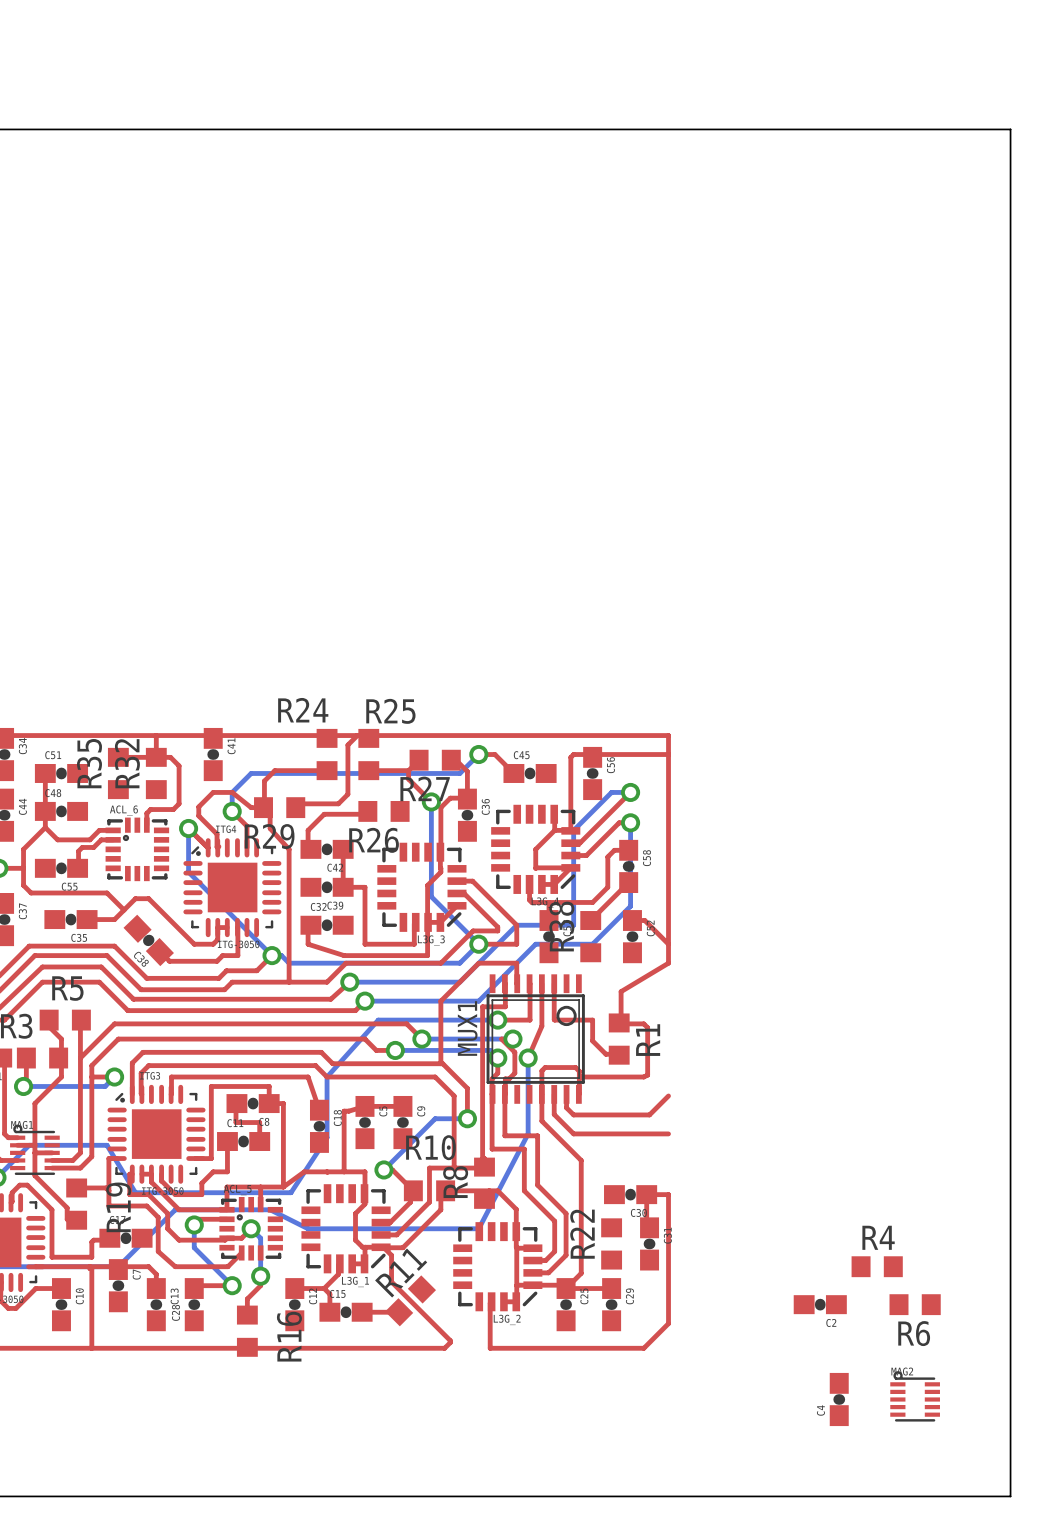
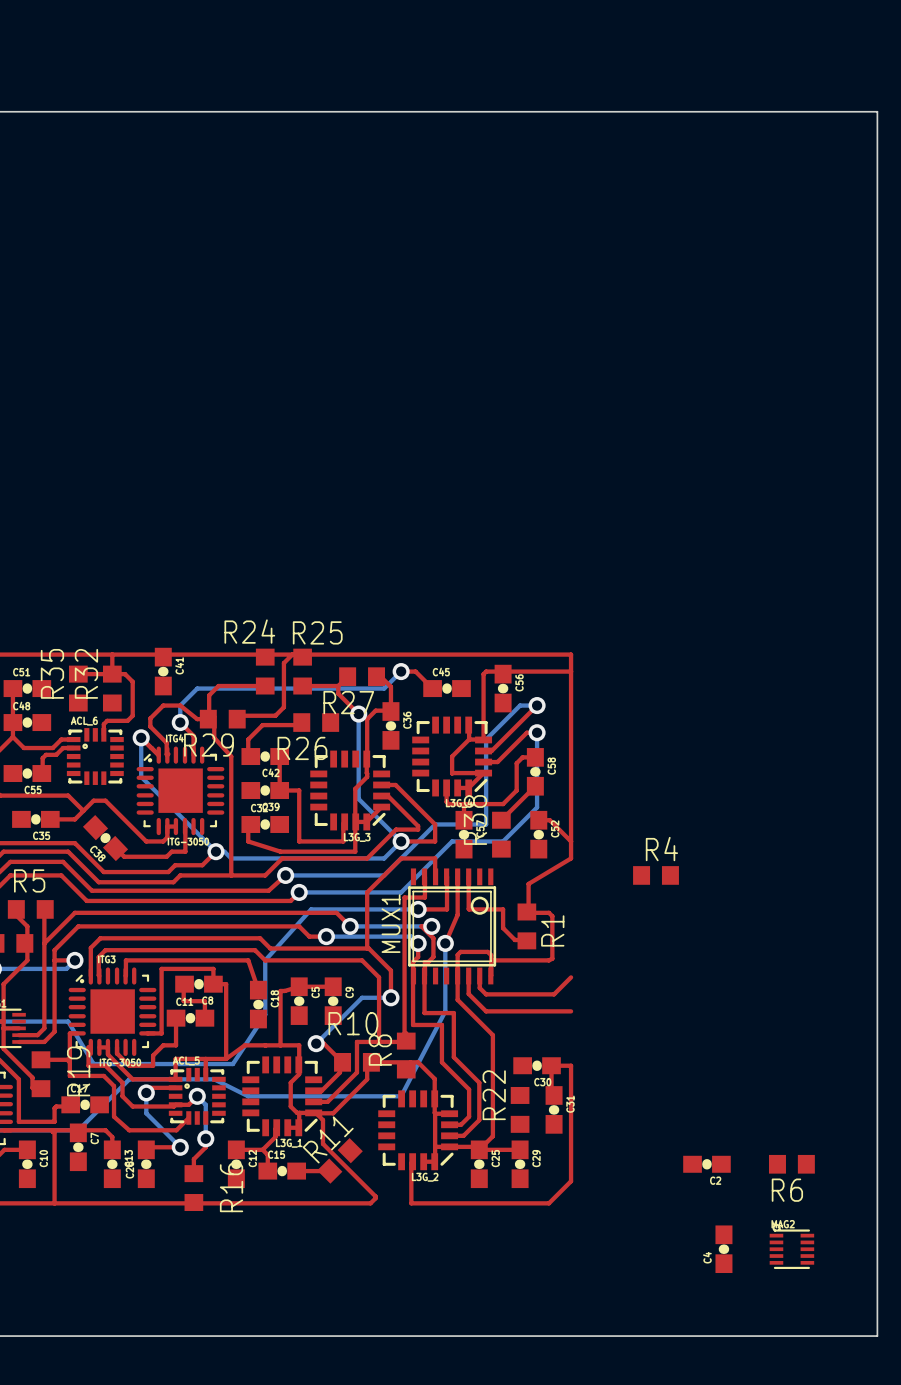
R4 position: (877, 1266) -> (656, 875)

